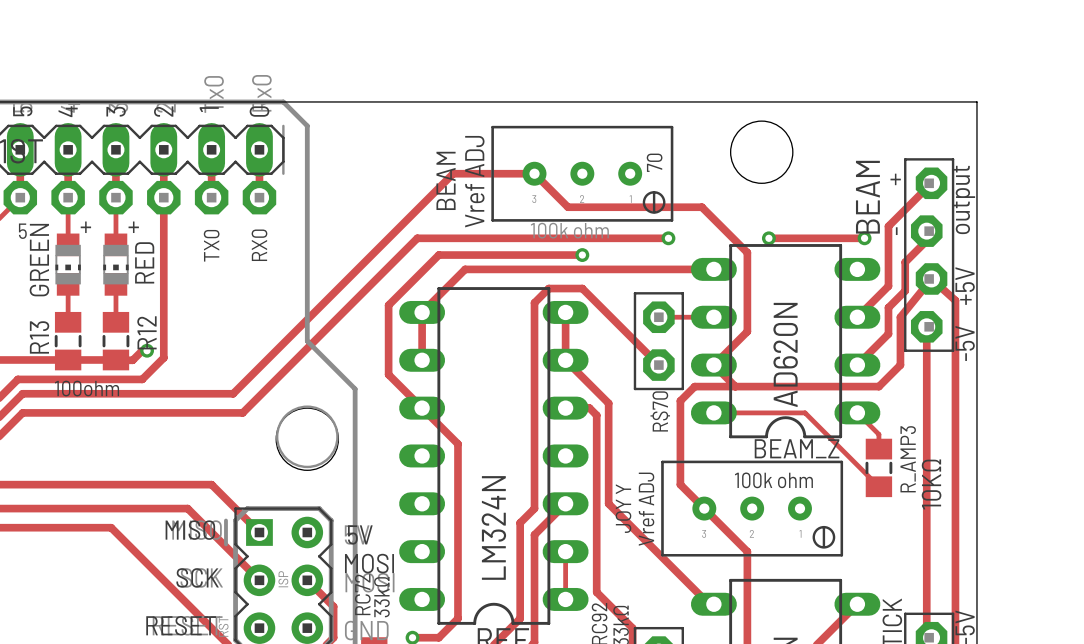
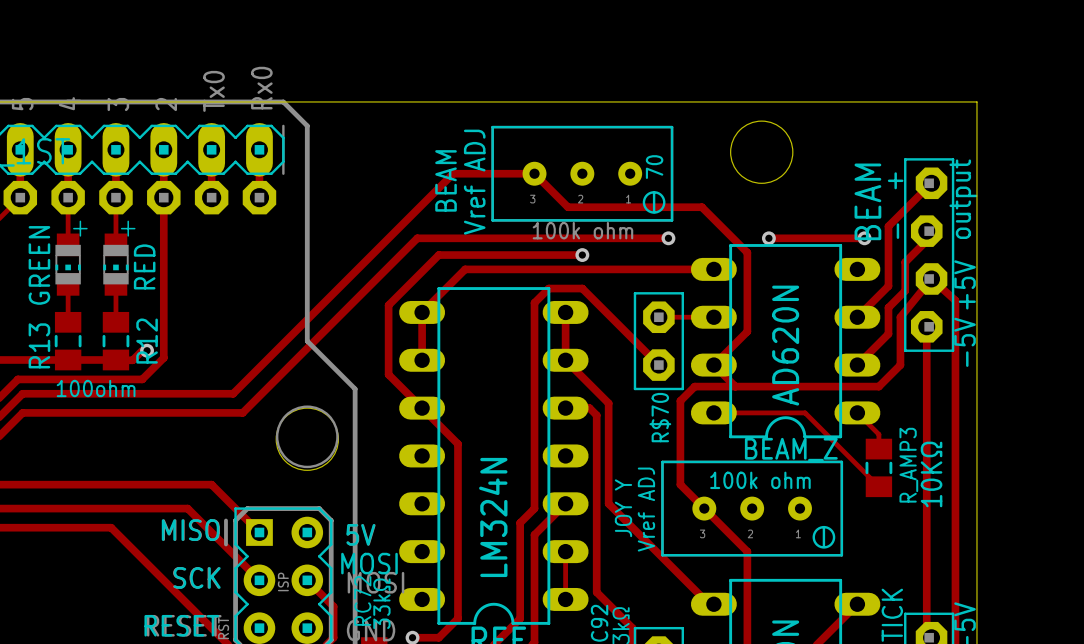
text: 1 (209, 109) -> none
text: 5 (22, 111) -> none
text: 4 (68, 111) -> none
text: 3 (116, 111) -> none
text: 2 (163, 111) -> none
text: 0 (259, 111) -> none
text: 5 (22, 231) -> none
text: TX0 (211, 245) -> none
text: RX0 (259, 245) -> none

